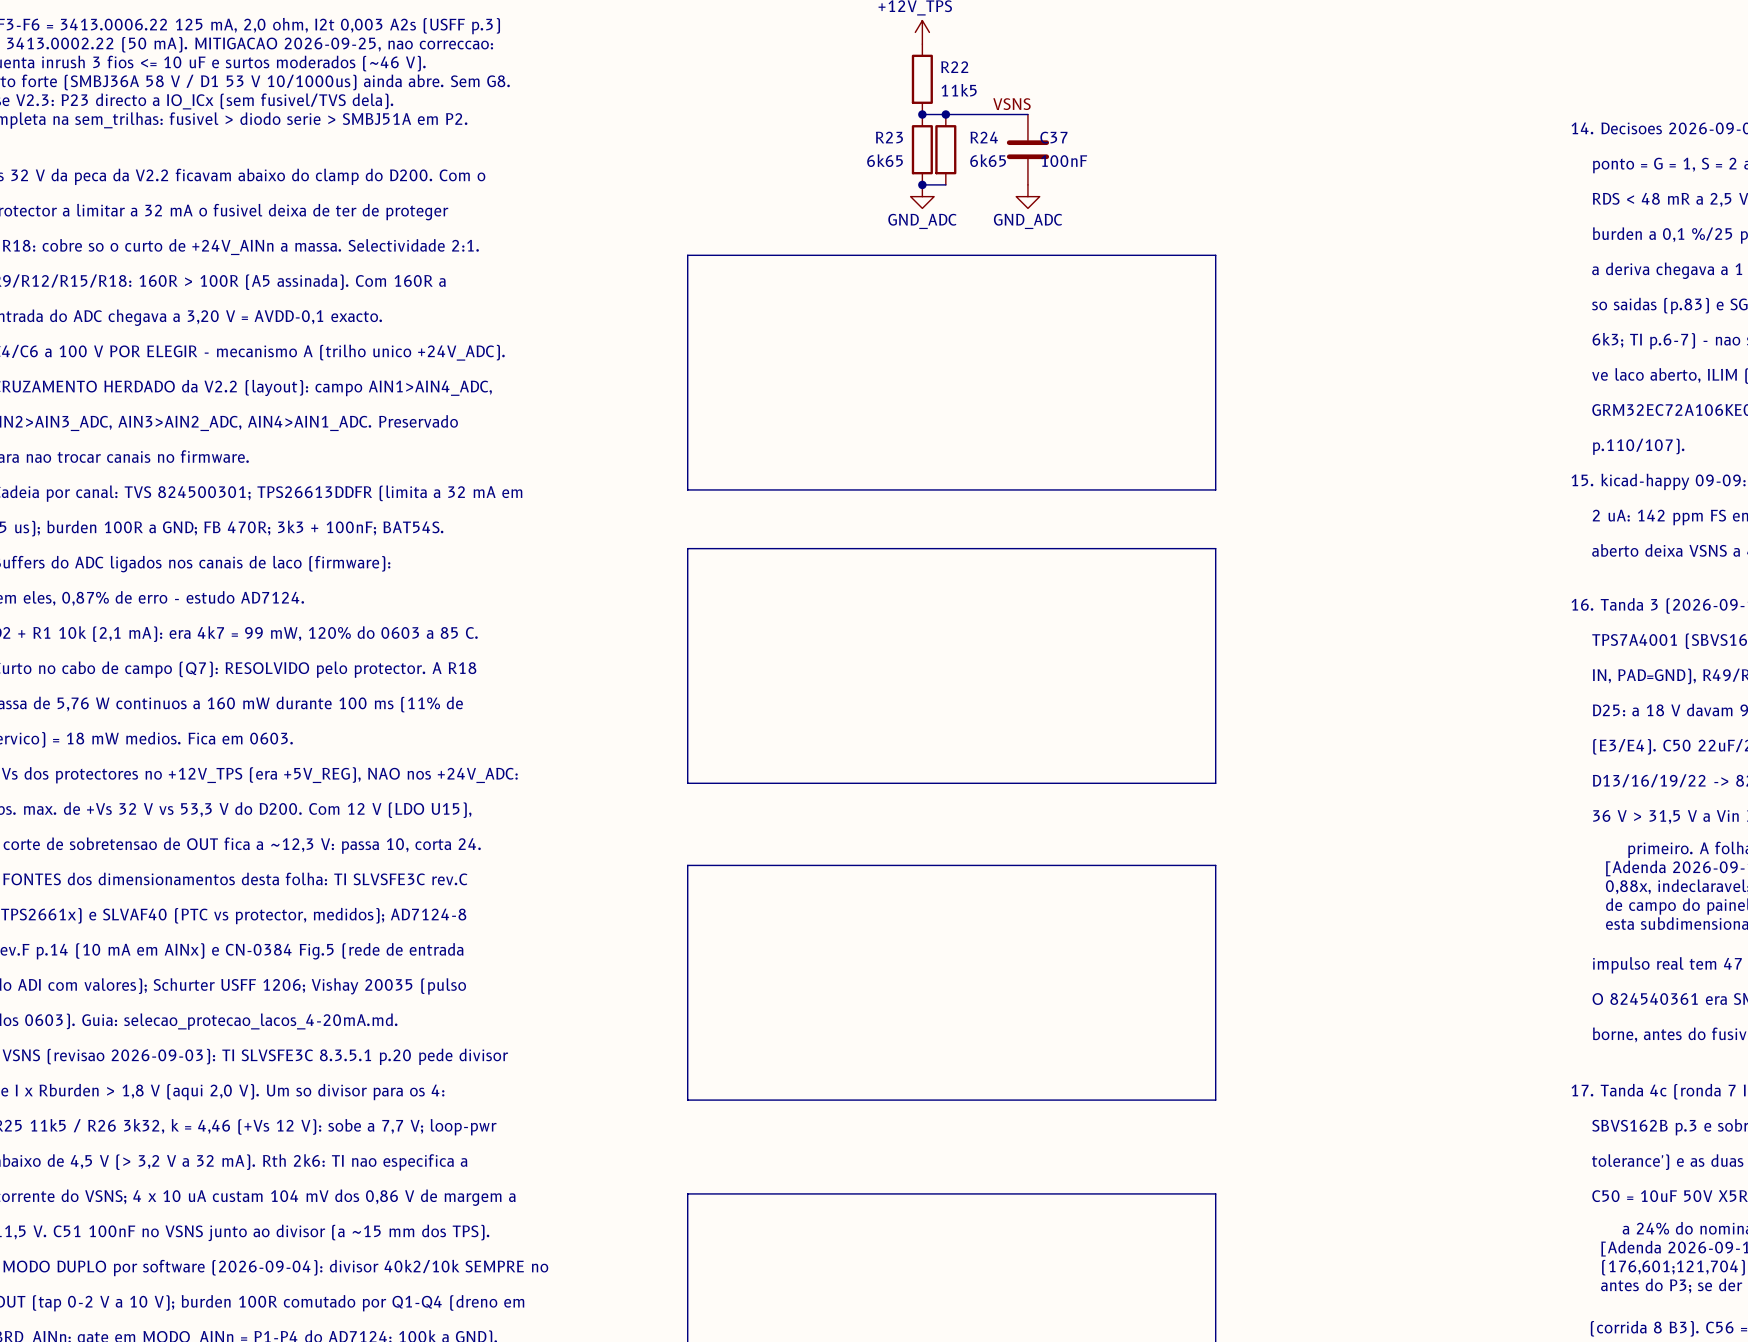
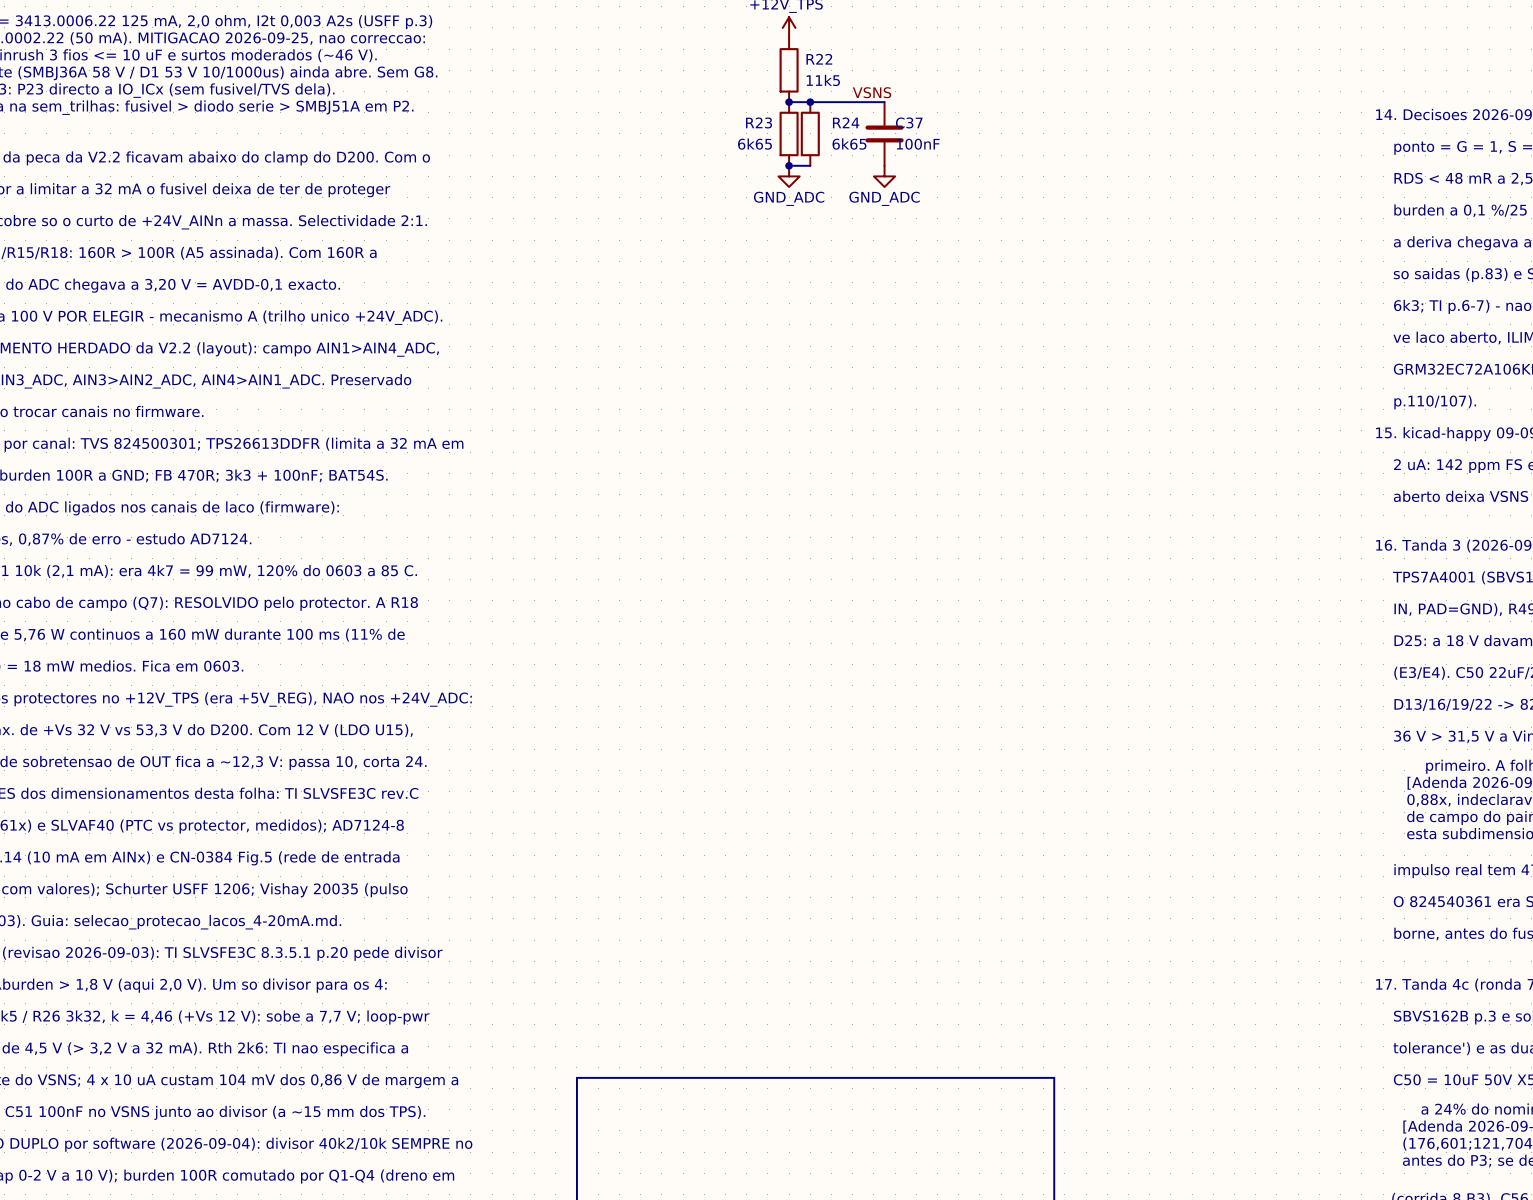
line: (687, 255) (687, 489) (1215, 489) (1215, 255) (687, 255) -> none
line: (687, 548) (1215, 548) (1215, 783) (687, 783) (687, 548) -> none
line: (687, 865) (687, 1100) (1215, 1100) (1215, 865) (687, 865) -> none

